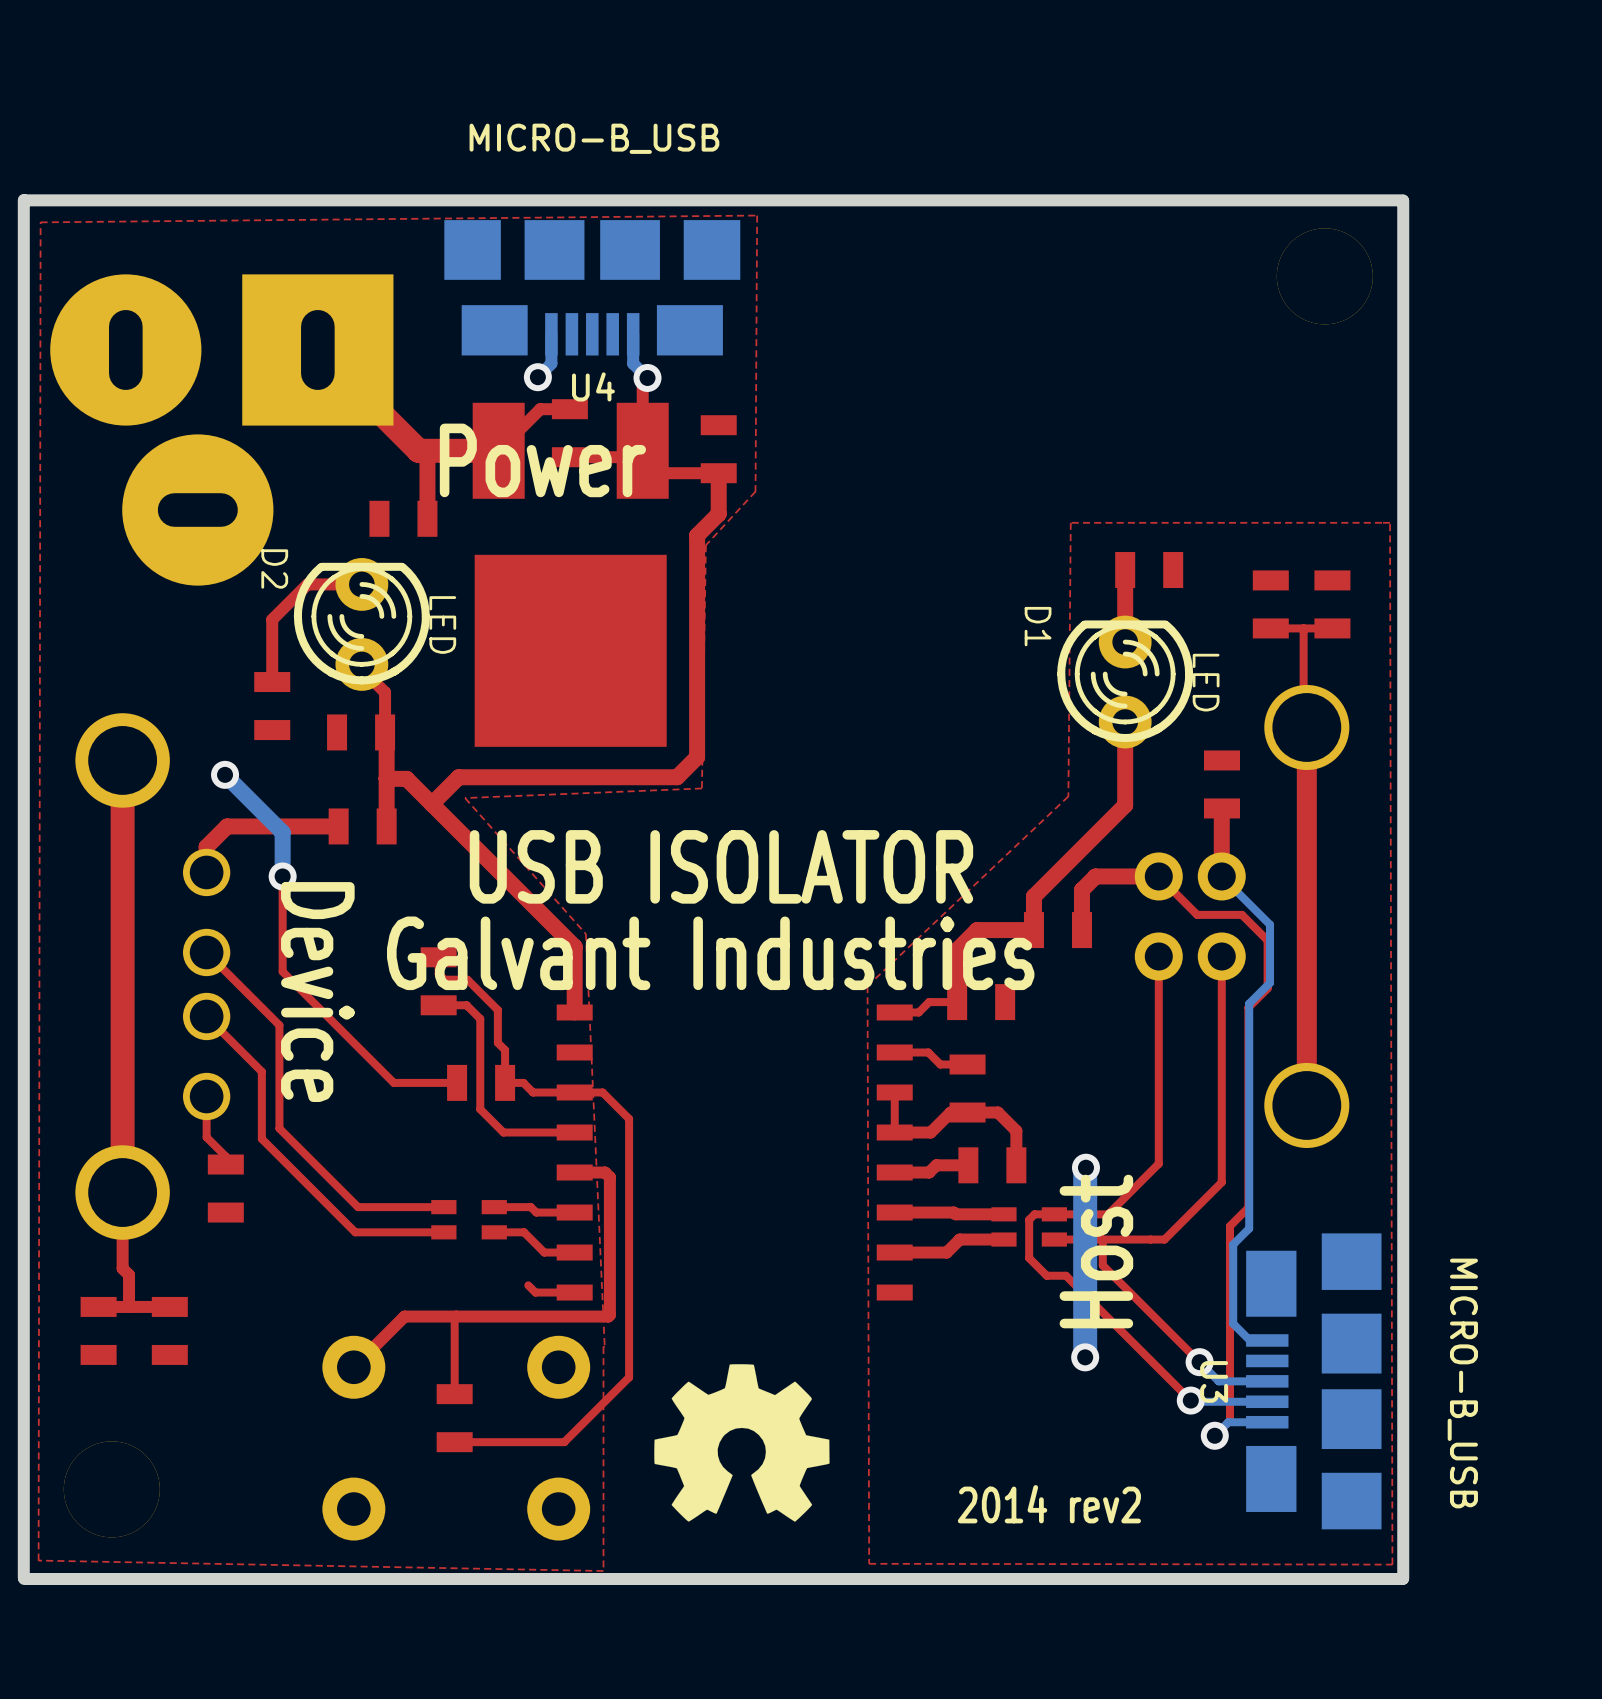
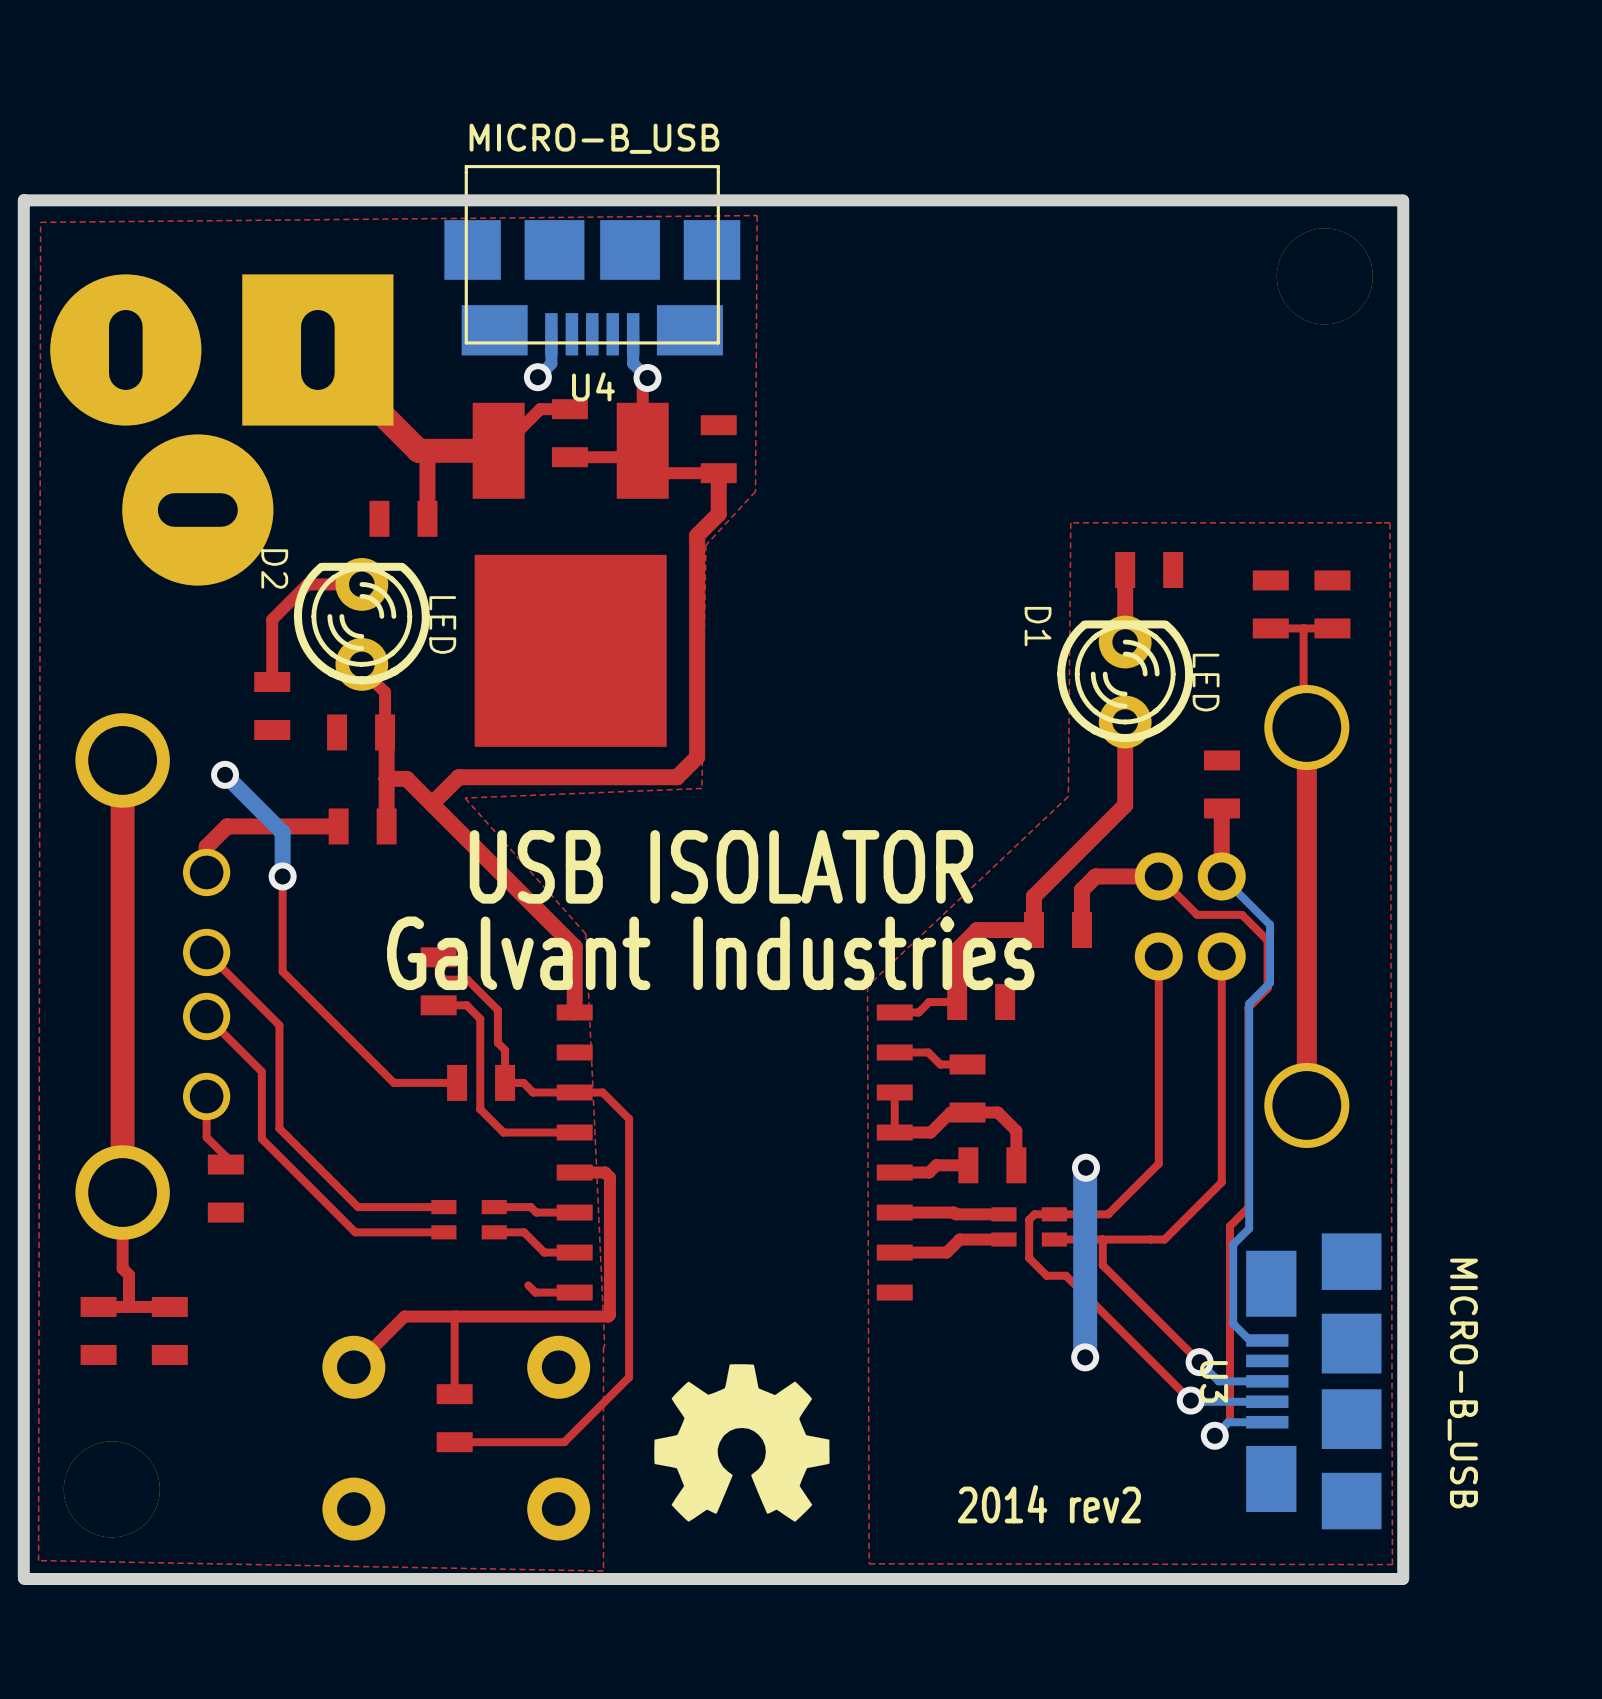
U4 footprint: [444, 220, 741, 356] -> [444, 165, 741, 356]
text: Power (542, 460) -> none
text: Device (317, 992) -> none
text: Host (1096, 1251) -> none

